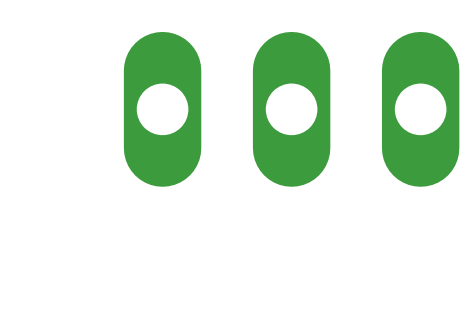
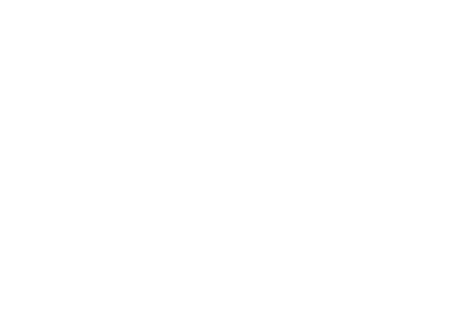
part: (291, 109) -> none

